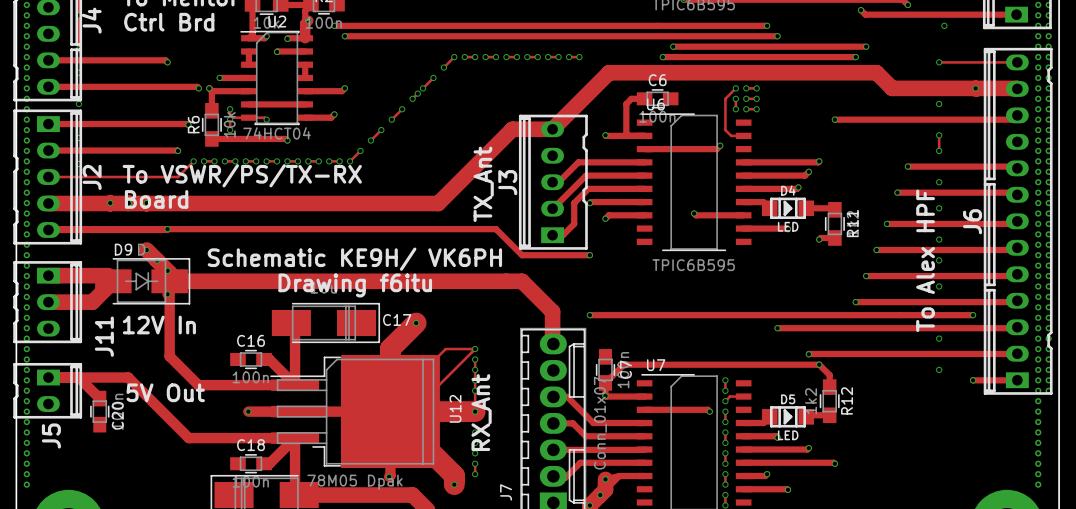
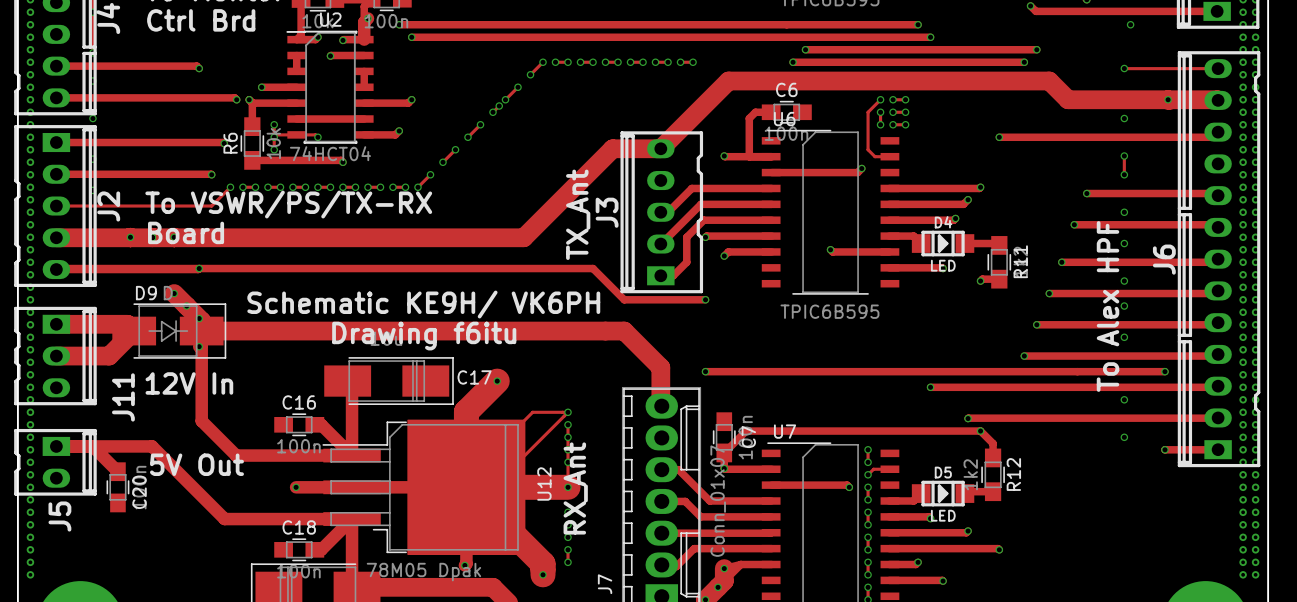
part: none -> (1255, 474)
part: none -> (1255, 487)
part: none -> (1255, 499)
part: none -> (1255, 512)
part: none -> (1255, 524)
part: none -> (1255, 537)
part: none -> (1255, 549)
part: none -> (1255, 562)
part: none -> (1255, 574)

